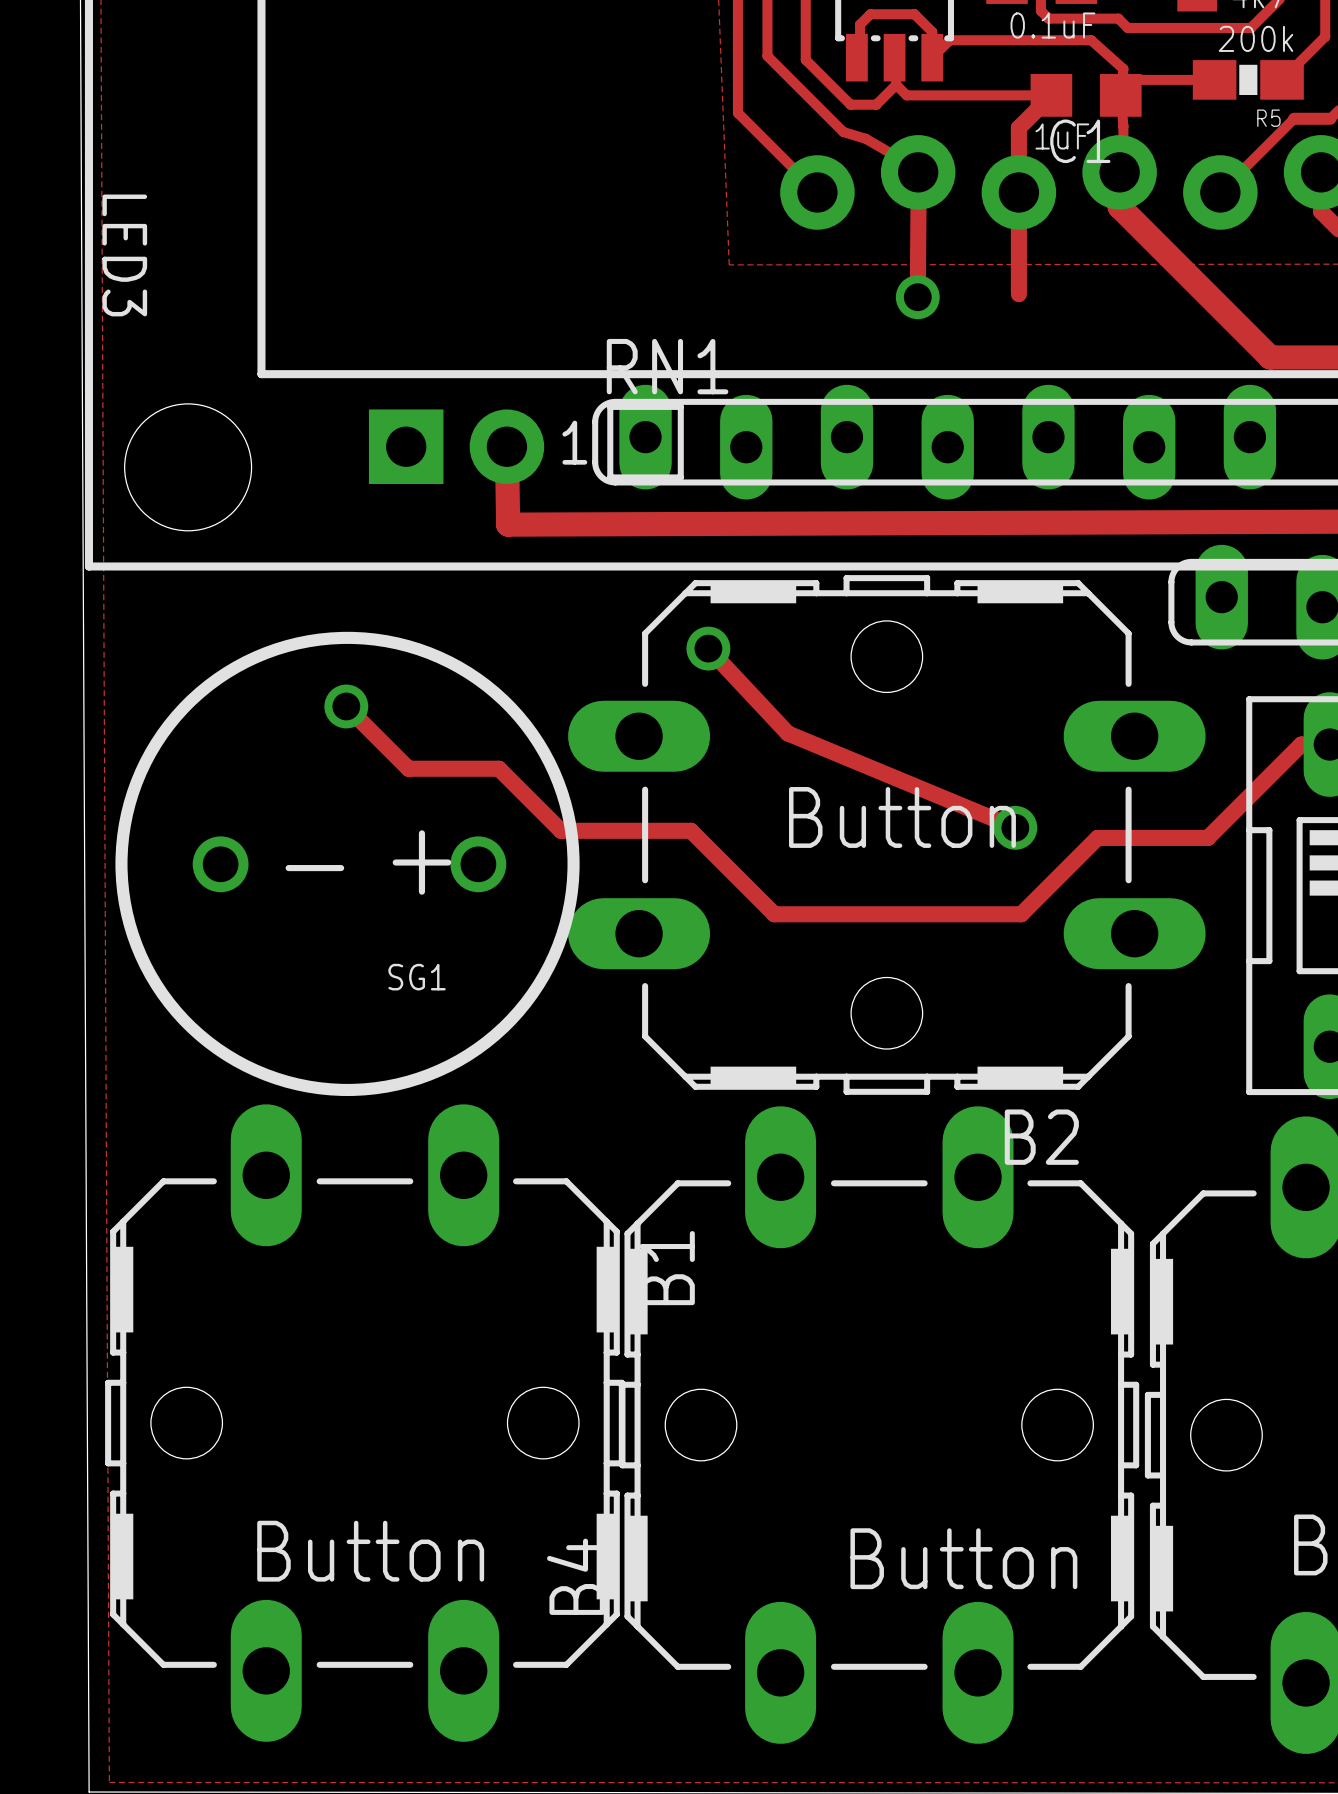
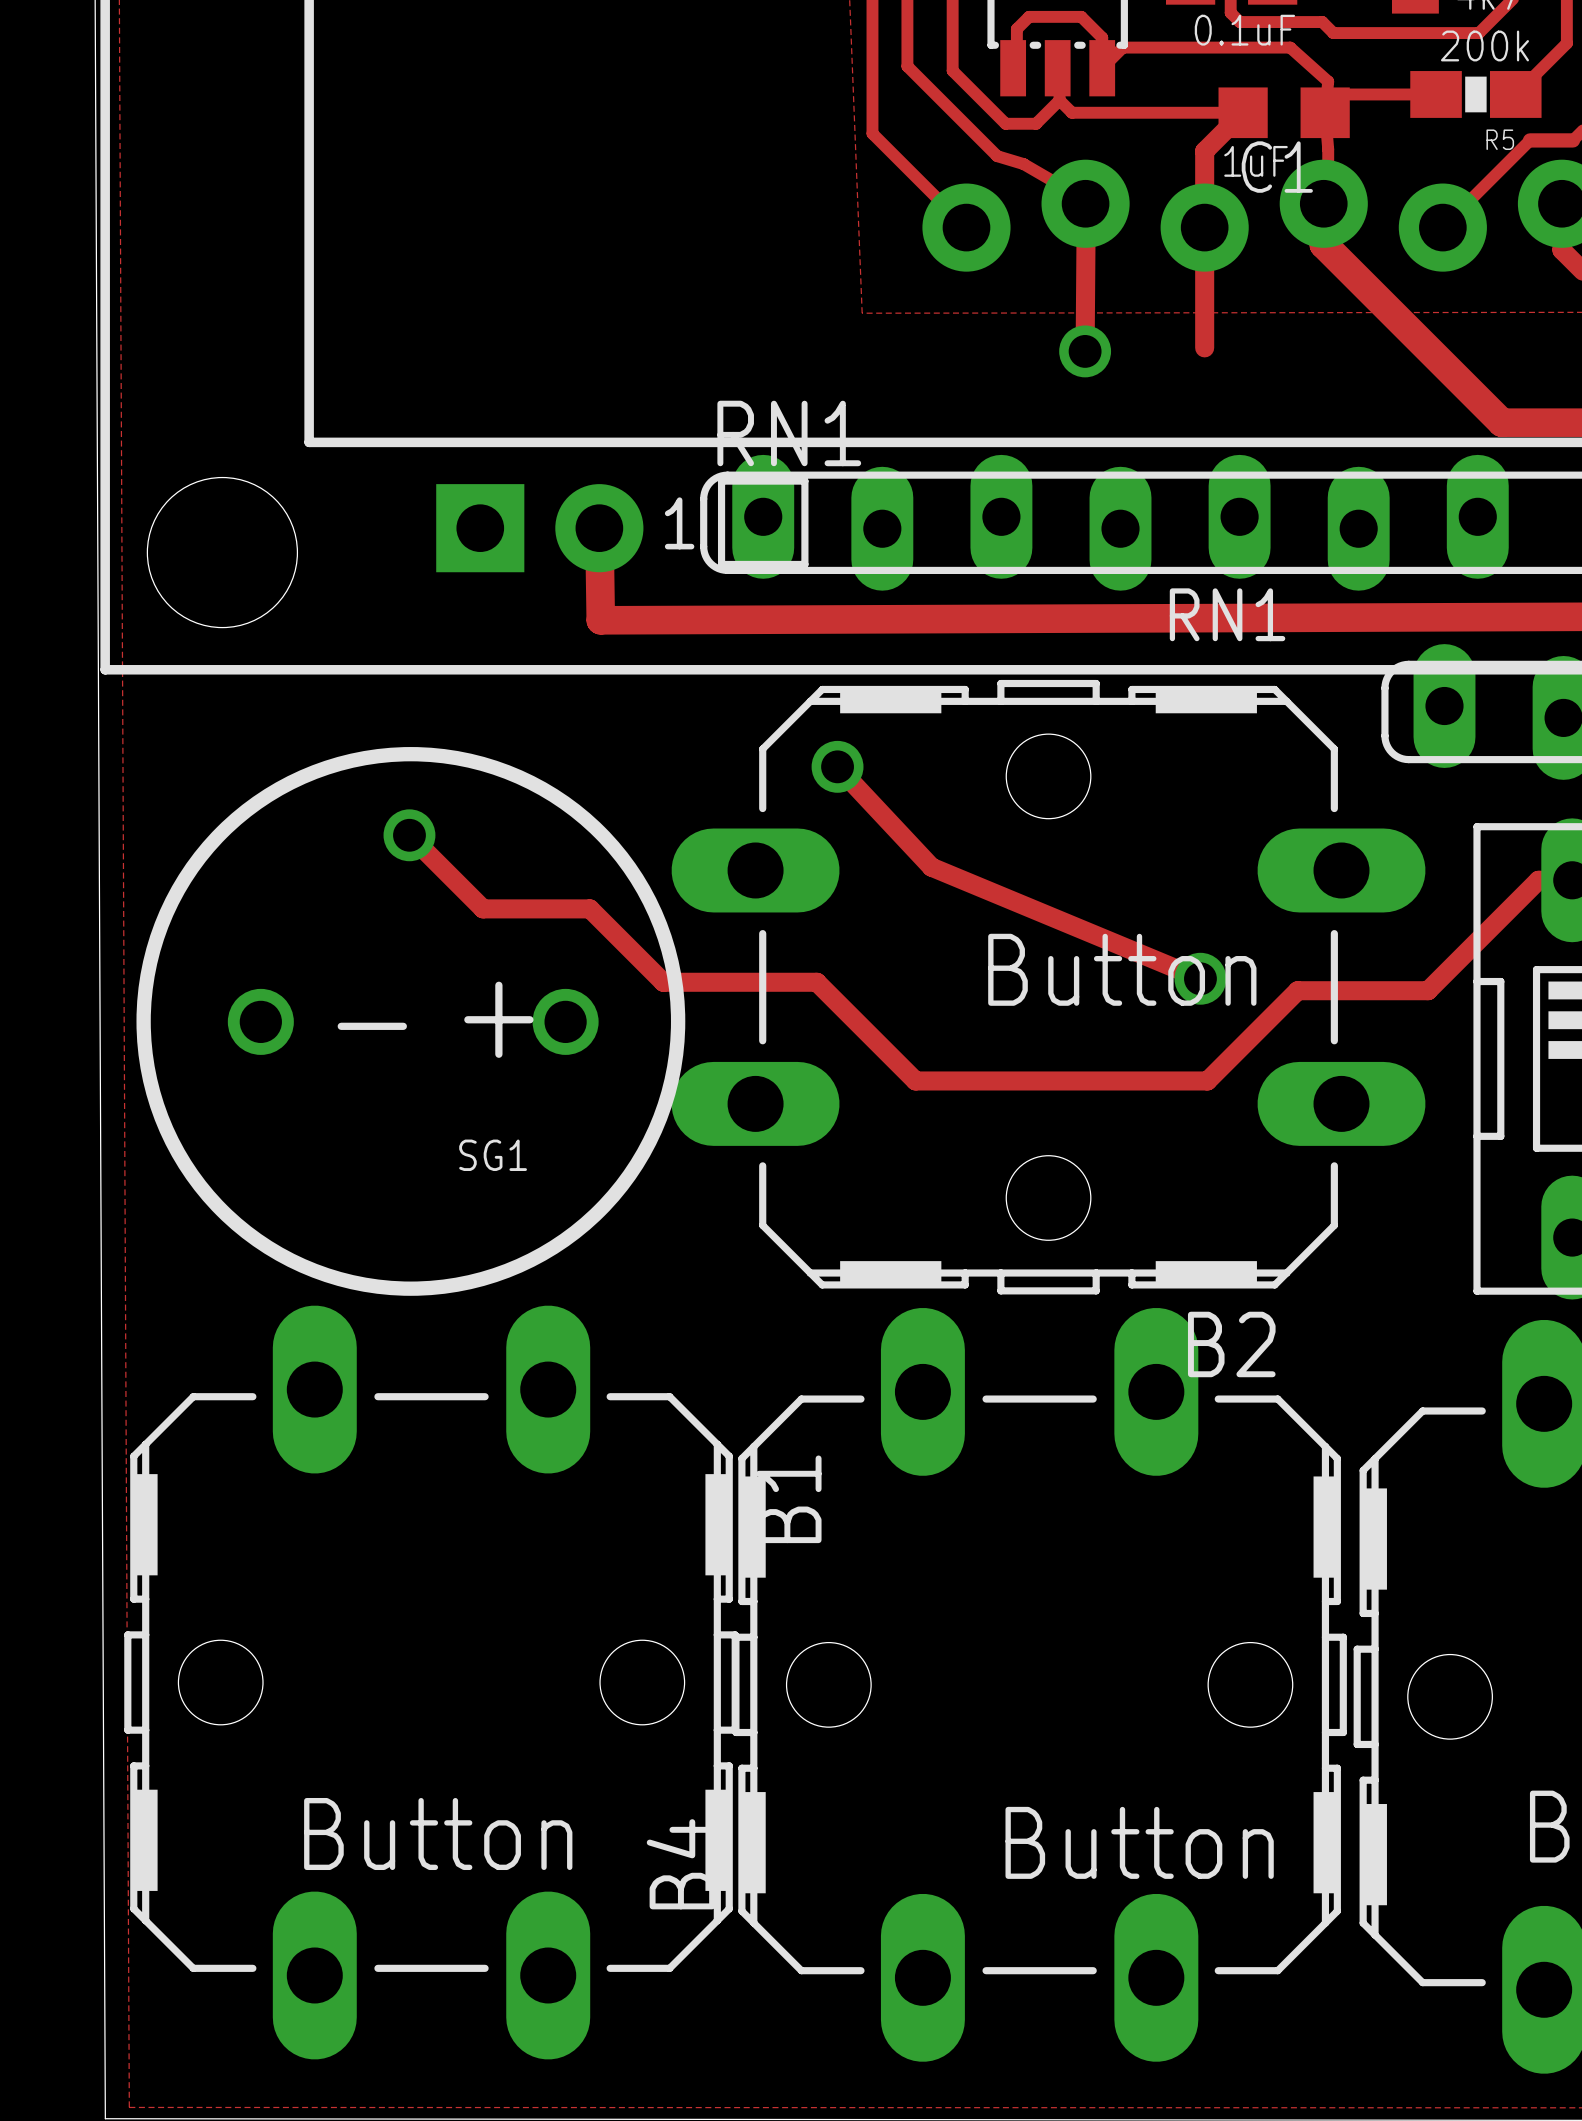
text: LED3 (124, 255) -> none
text: none -> RN1 (1227, 614)
text position: Button (902, 817) -> Button (1122, 969)

